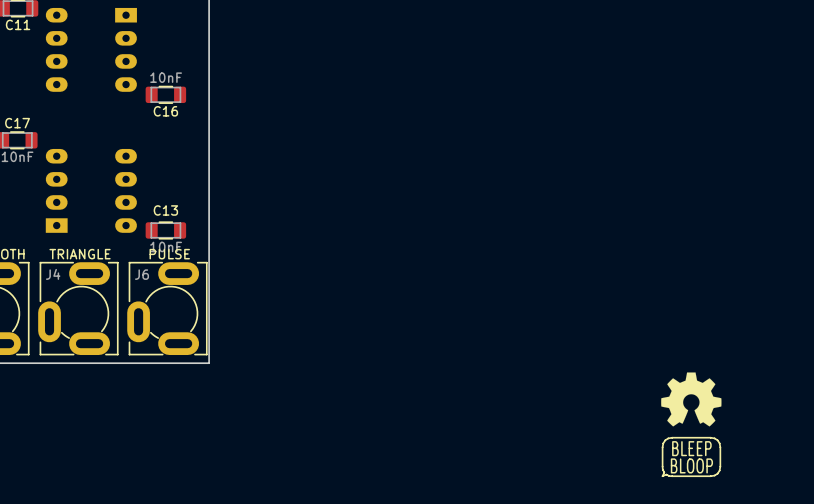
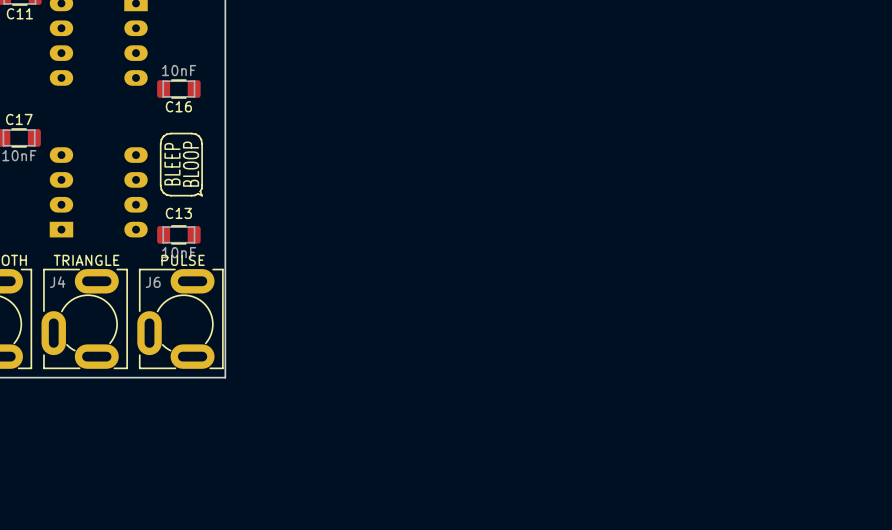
drawing: none -> [160, 132, 203, 197]
drawing: [661, 372, 722, 477] -> none

